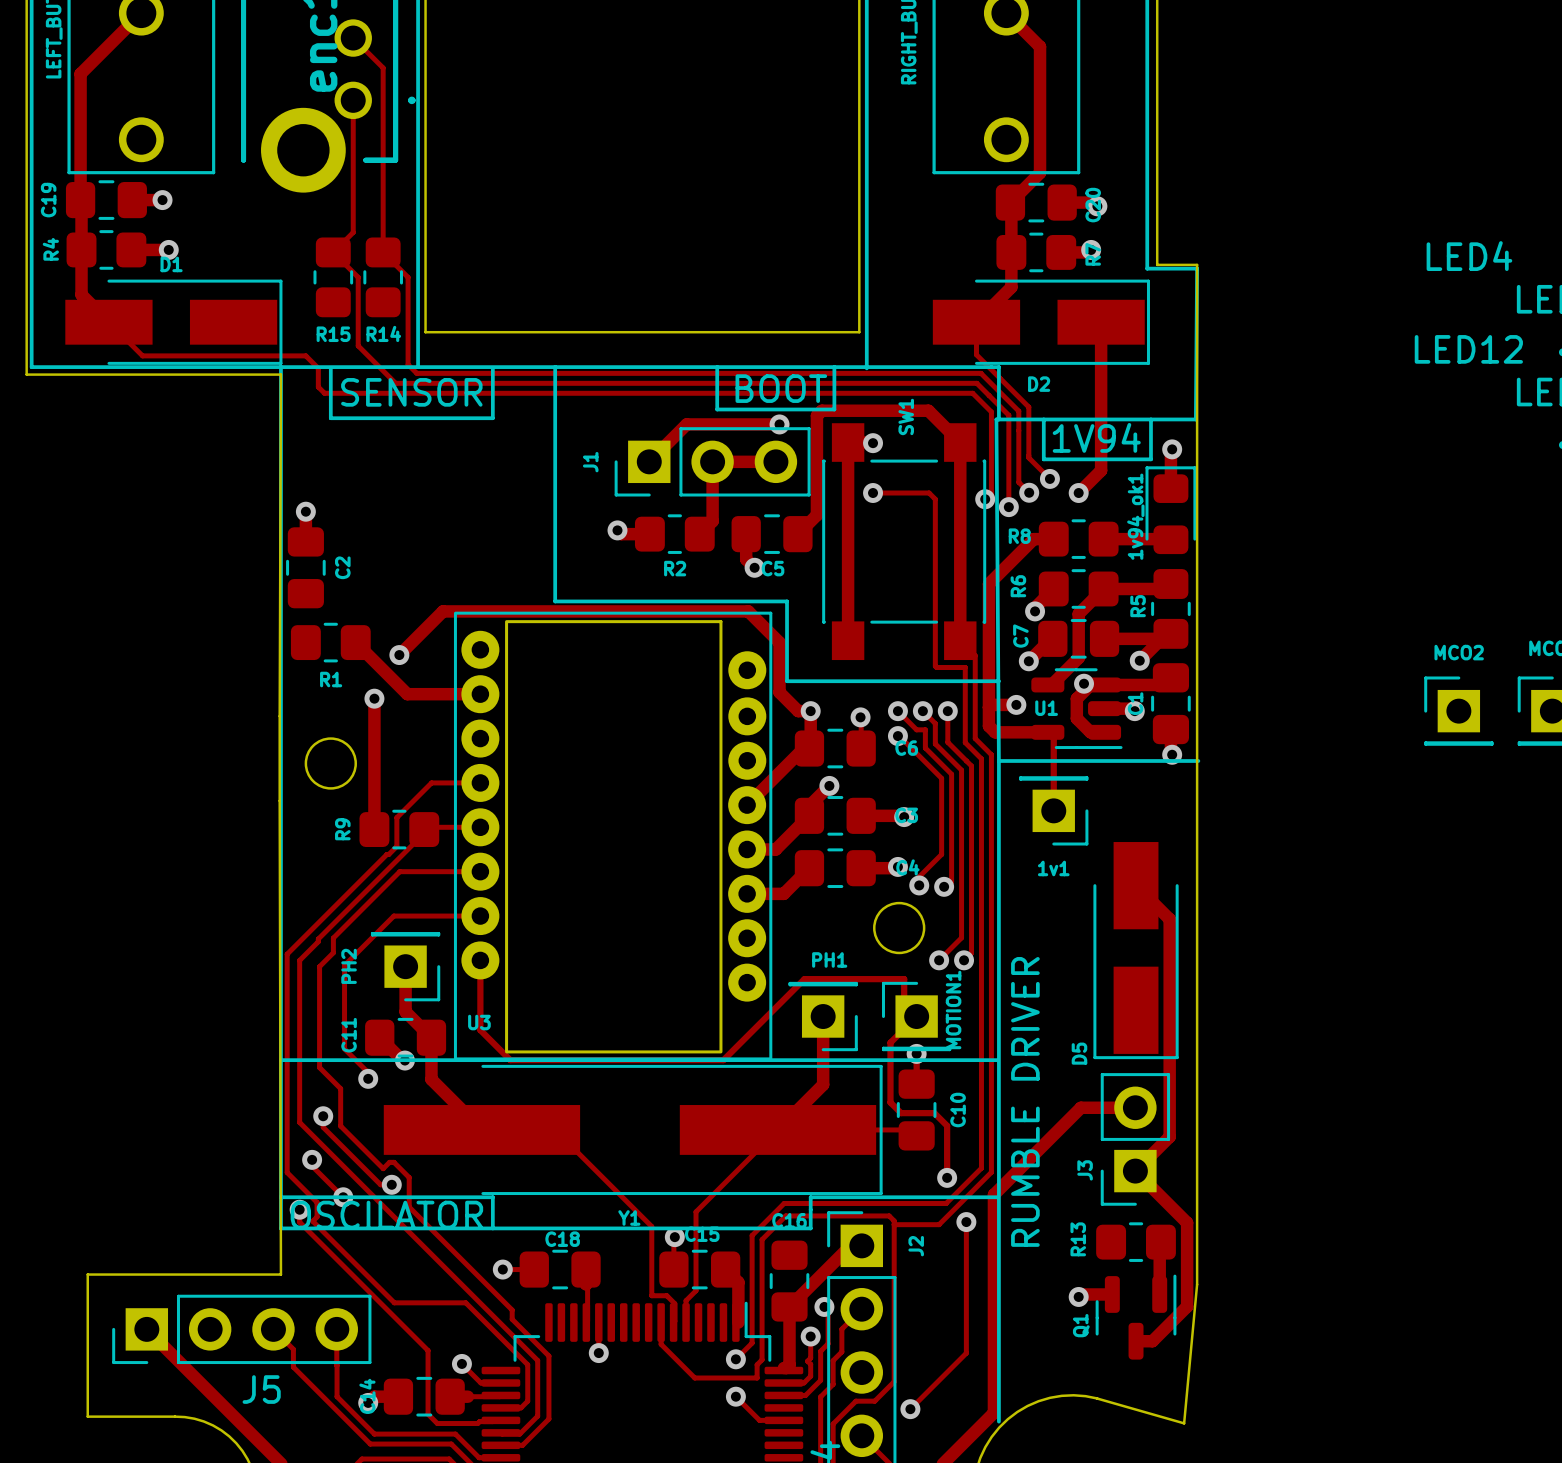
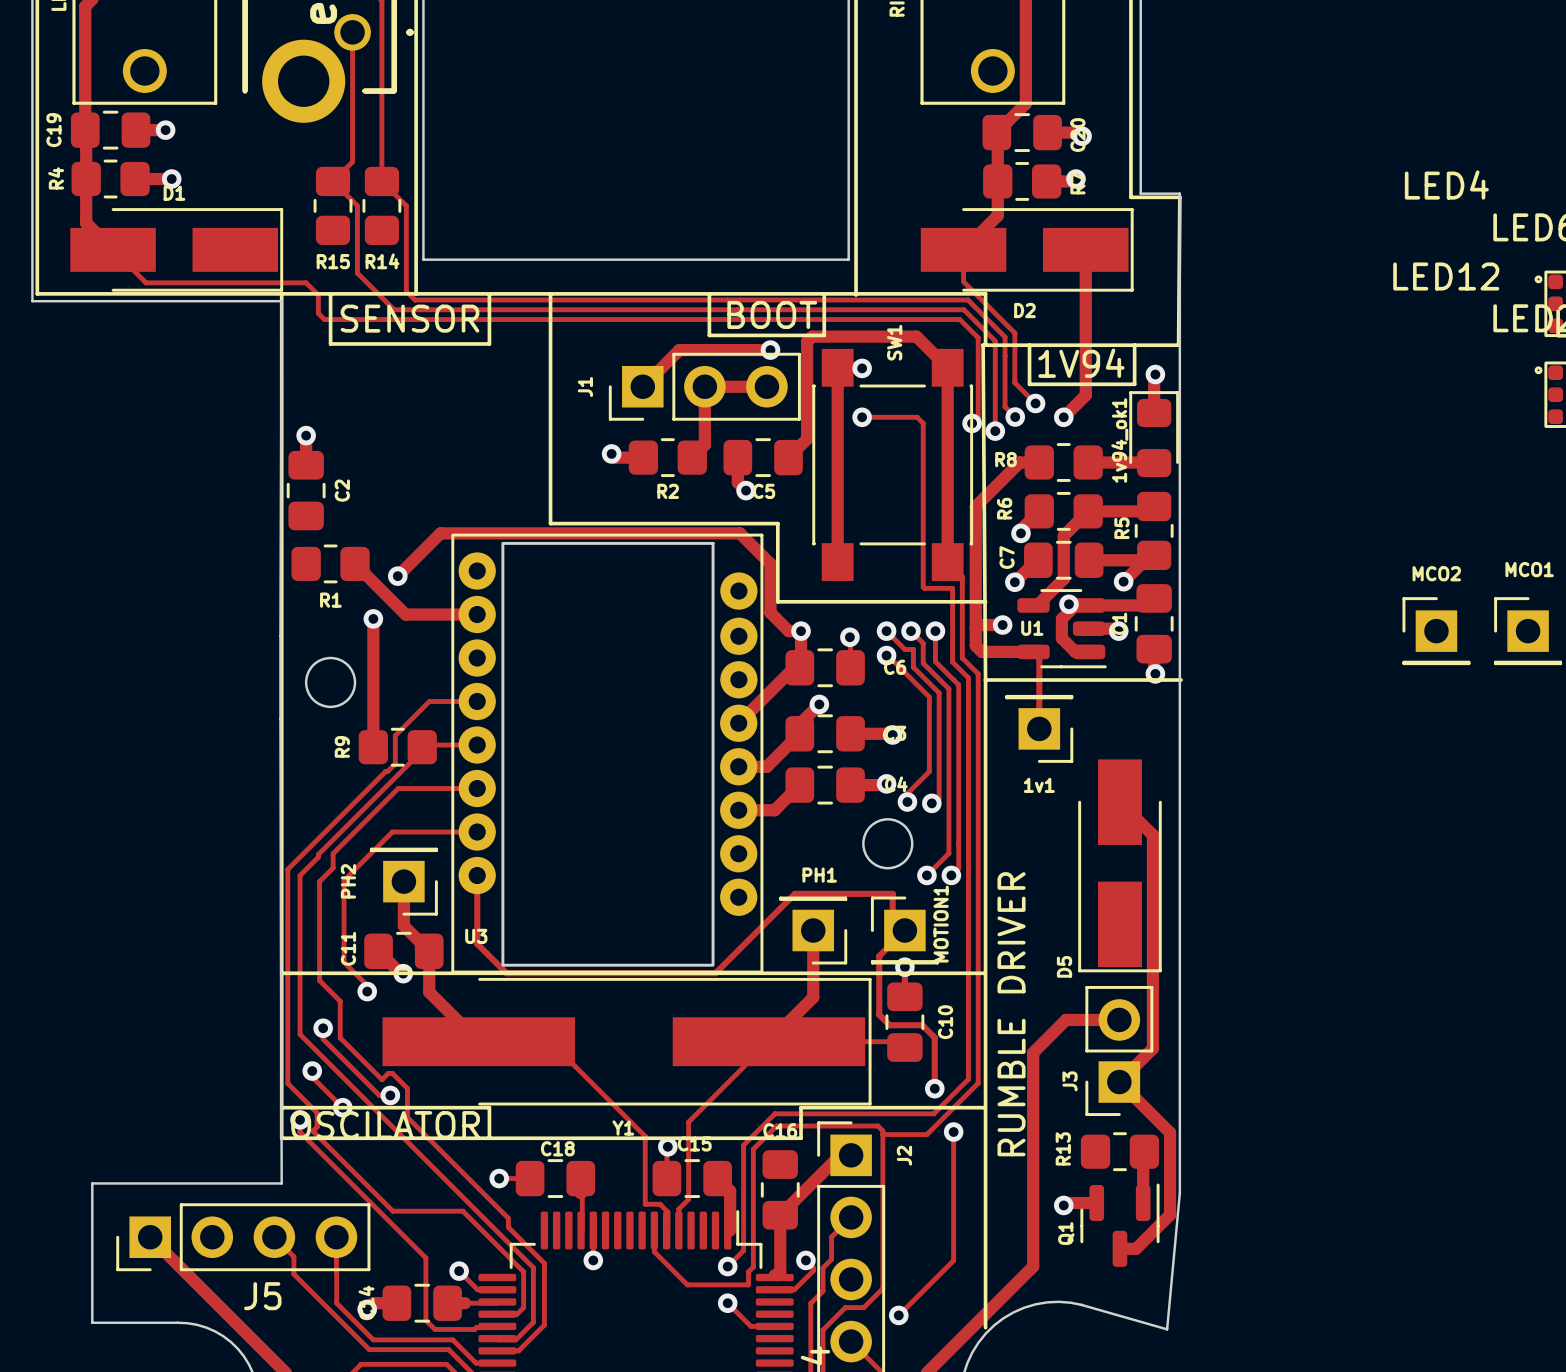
track: (1047, 1141) (993, 1194) (993, 1412) -> (1033, 1052) (1033, 1266) (980, 1319)
track: (824, 1306) (828, 1310) (828, 1343) (820, 1351) (820, 1380) (805, 1395) (783, 1395) -> none
via: (824, 1306) -> none
track: (810, 1336) (810, 1358) (807, 1361) (810, 1364) (810, 1376) -> (805, 1260) (813, 1267) (813, 1270) (801, 1283)
via position: (810, 1336) -> (805, 1260)

